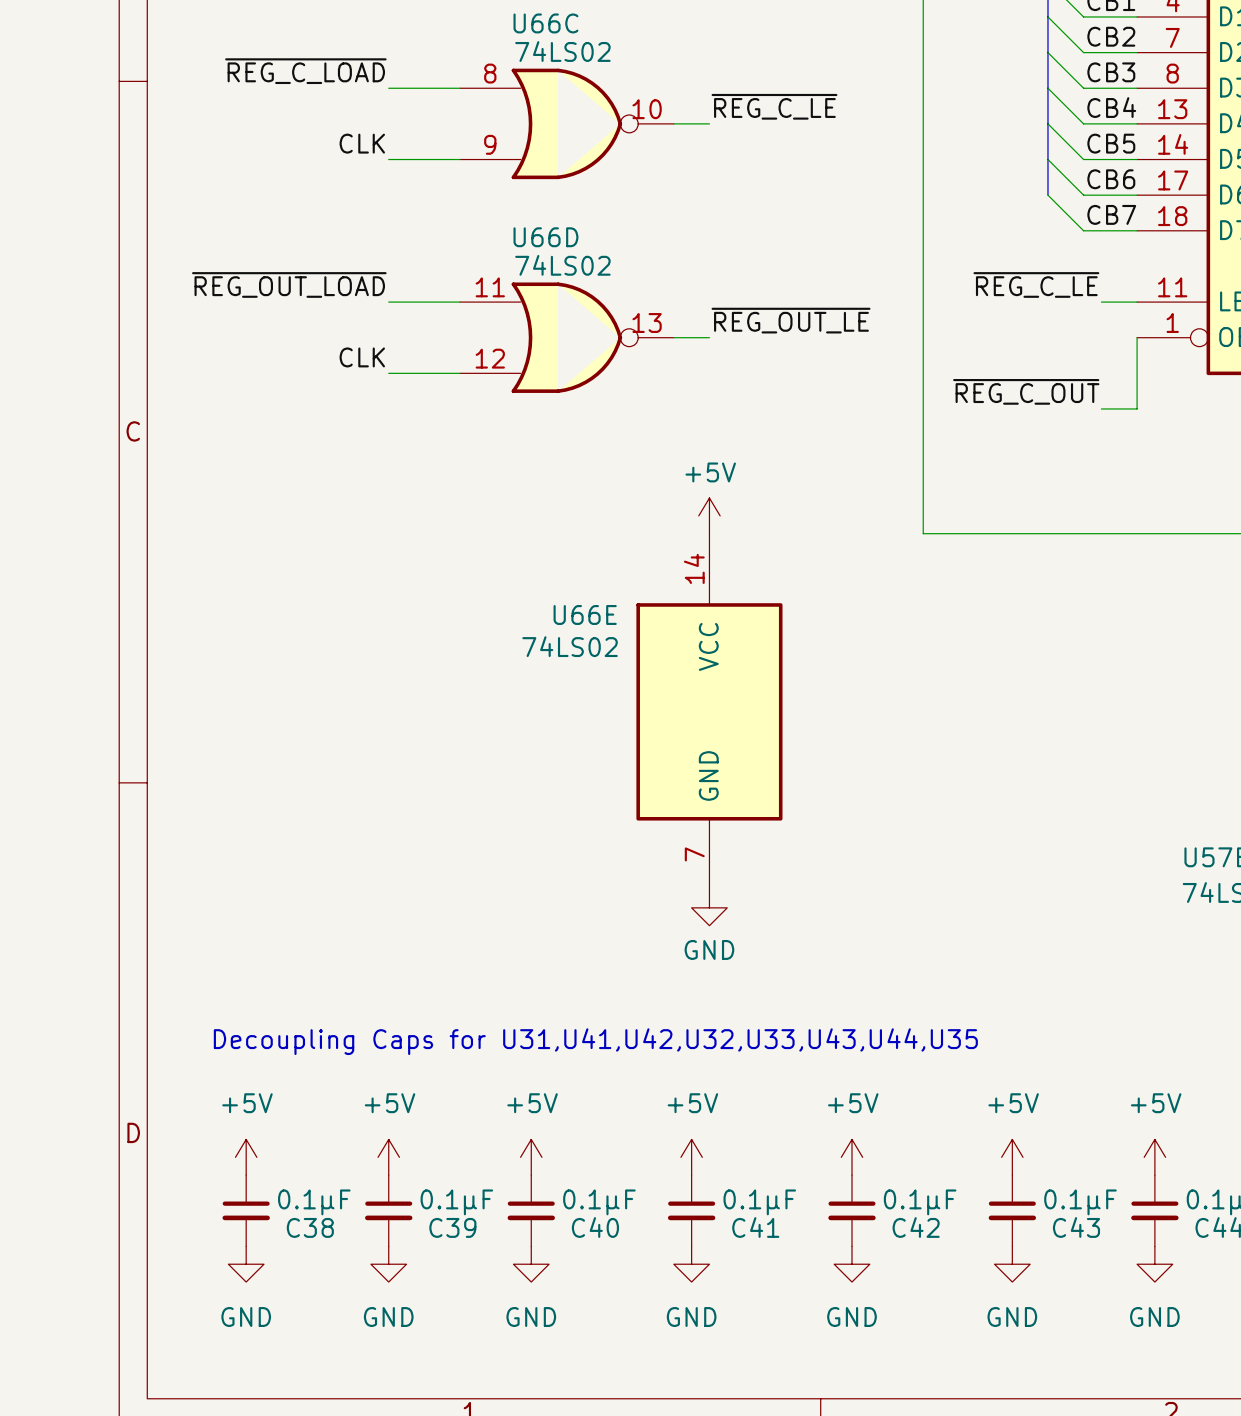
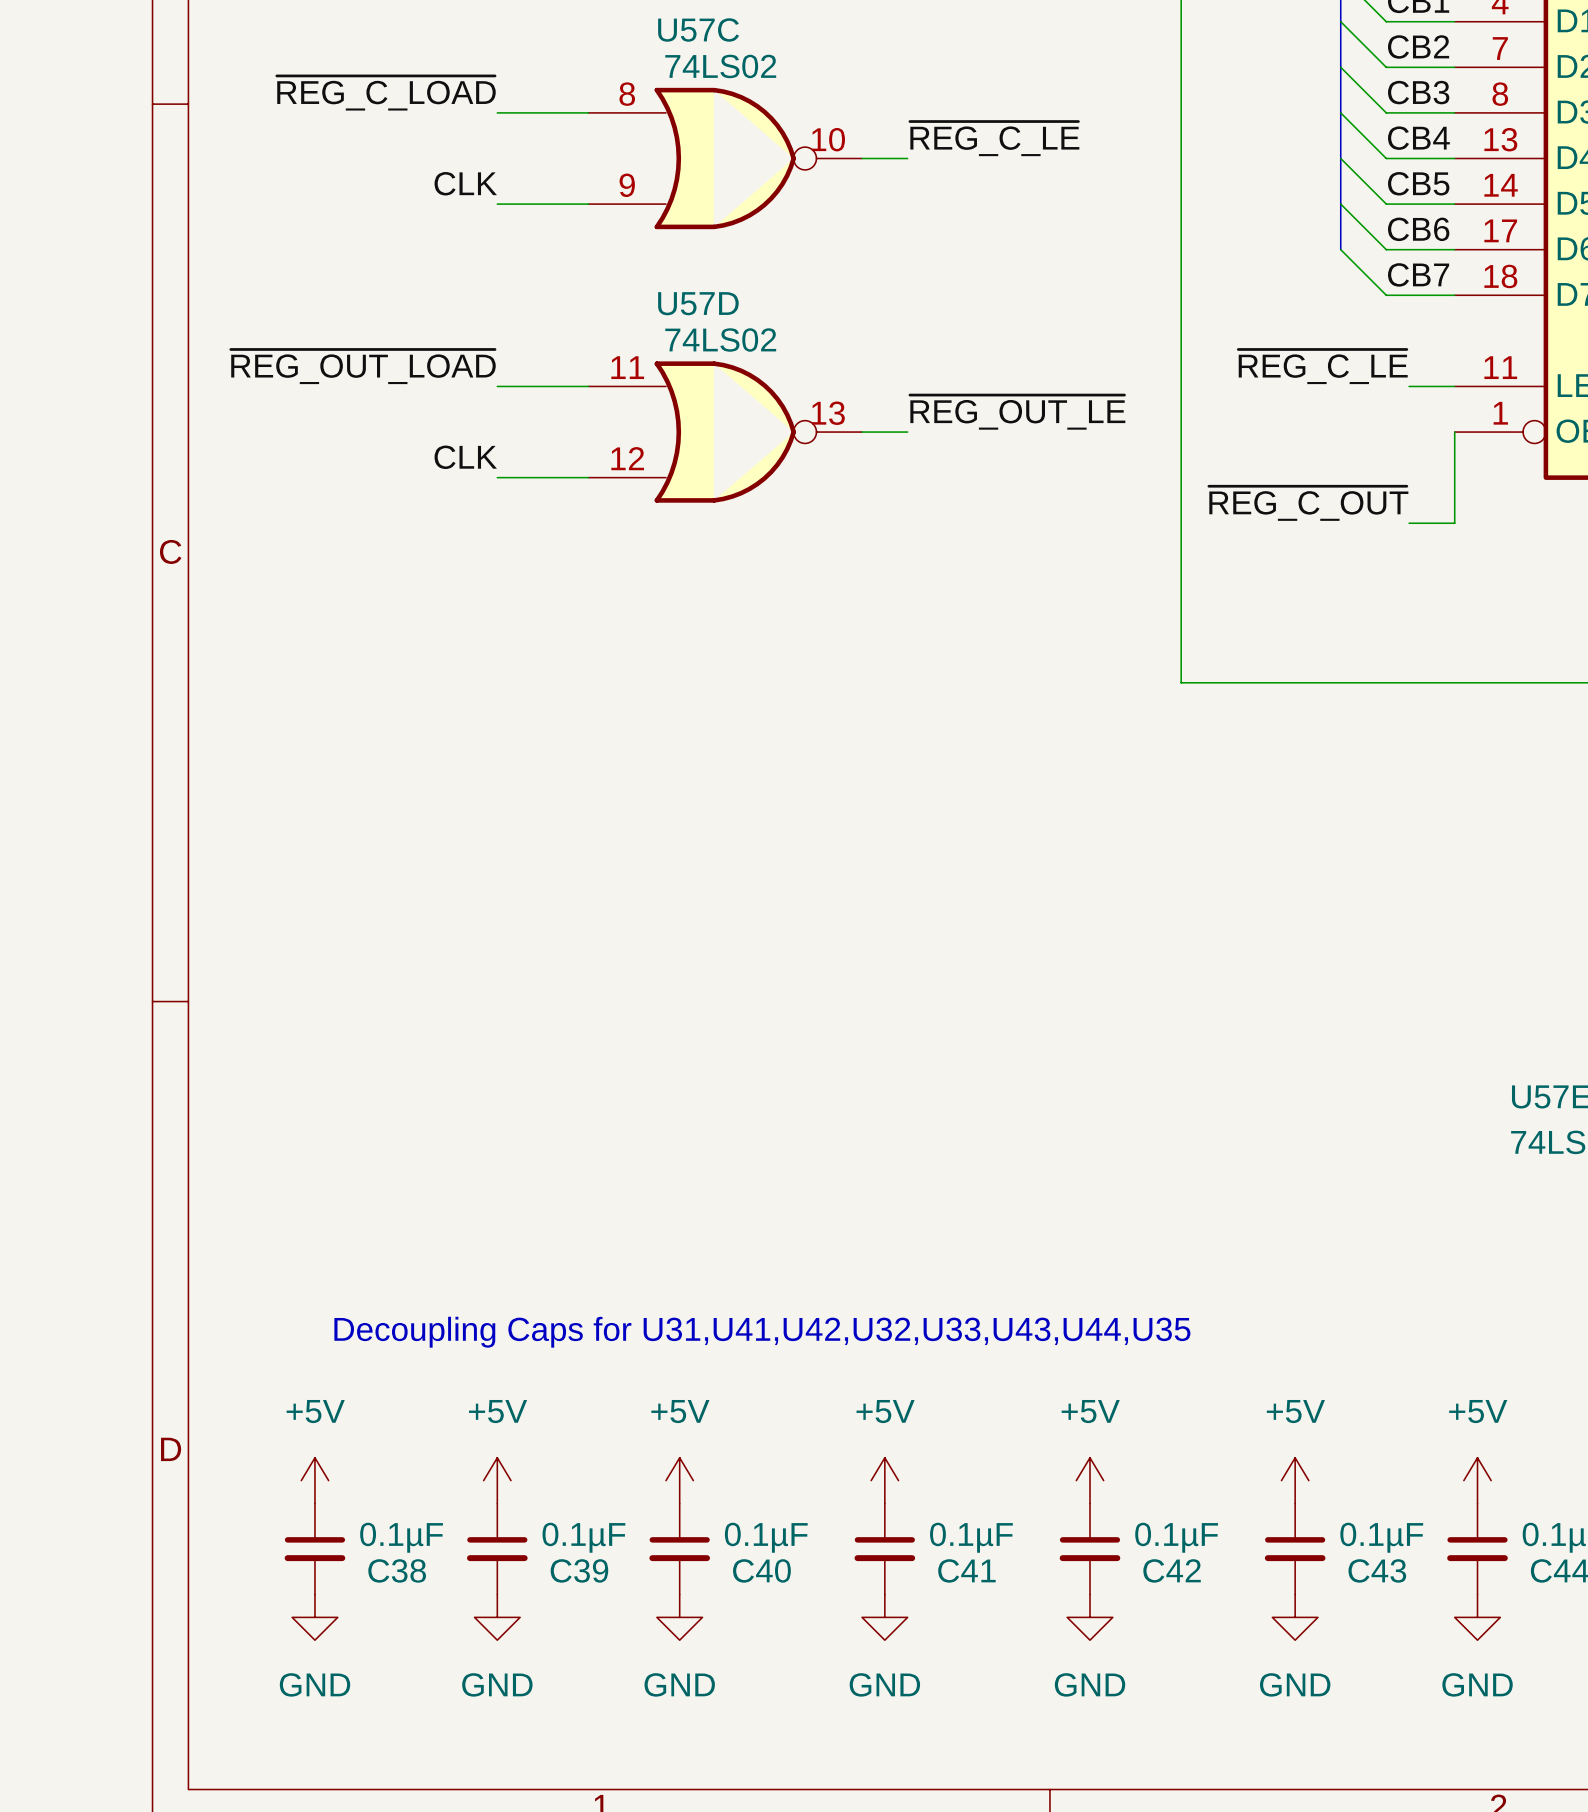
U66C name: U66C (545, 23) -> U57C (698, 29)
U66D name: U66D (545, 237) -> U57D (698, 303)
power symbol: +5V (709, 515) -> none
U66E: 74LS02 (709, 711) -> none
power symbol: GND (709, 907) -> none

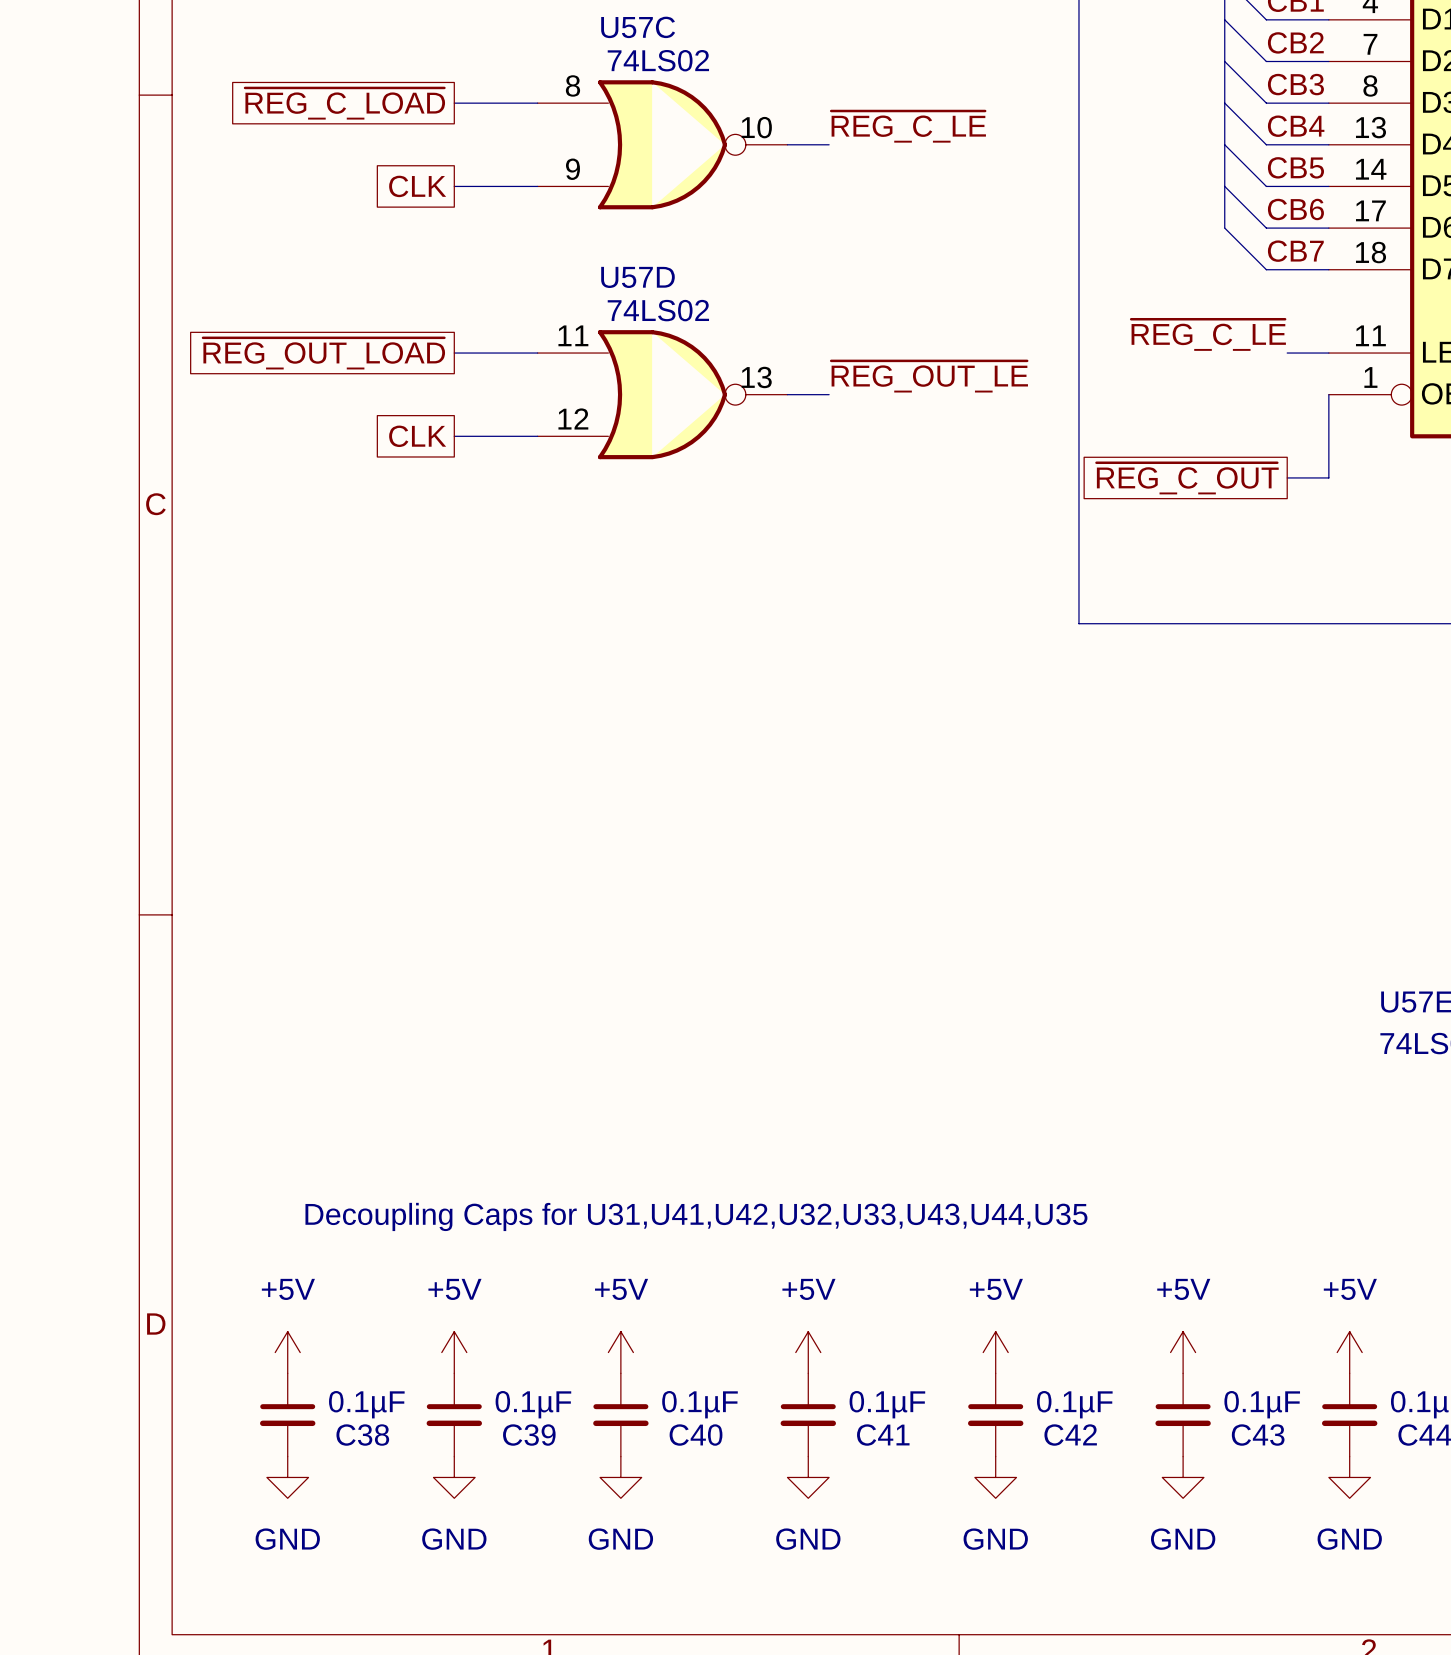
label: ~{REG_C_LOAD} (386, 93) -> none
global label: none -> ~{REG_C_LOAD} (345, 103)
label: CLK (465, 183) -> none
global label: none -> CLK (417, 186)
label: ~{REG_OUT_LOAD} (363, 366) -> none
global label: none -> ~{REG_OUT_LOAD} (324, 353)
label: CLK (465, 457) -> none
global label: none -> CLK (417, 436)
label: ~{REG_C_OUT} (1308, 503) -> none
global label: none -> ~{REG_C_OUT} (1187, 478)

